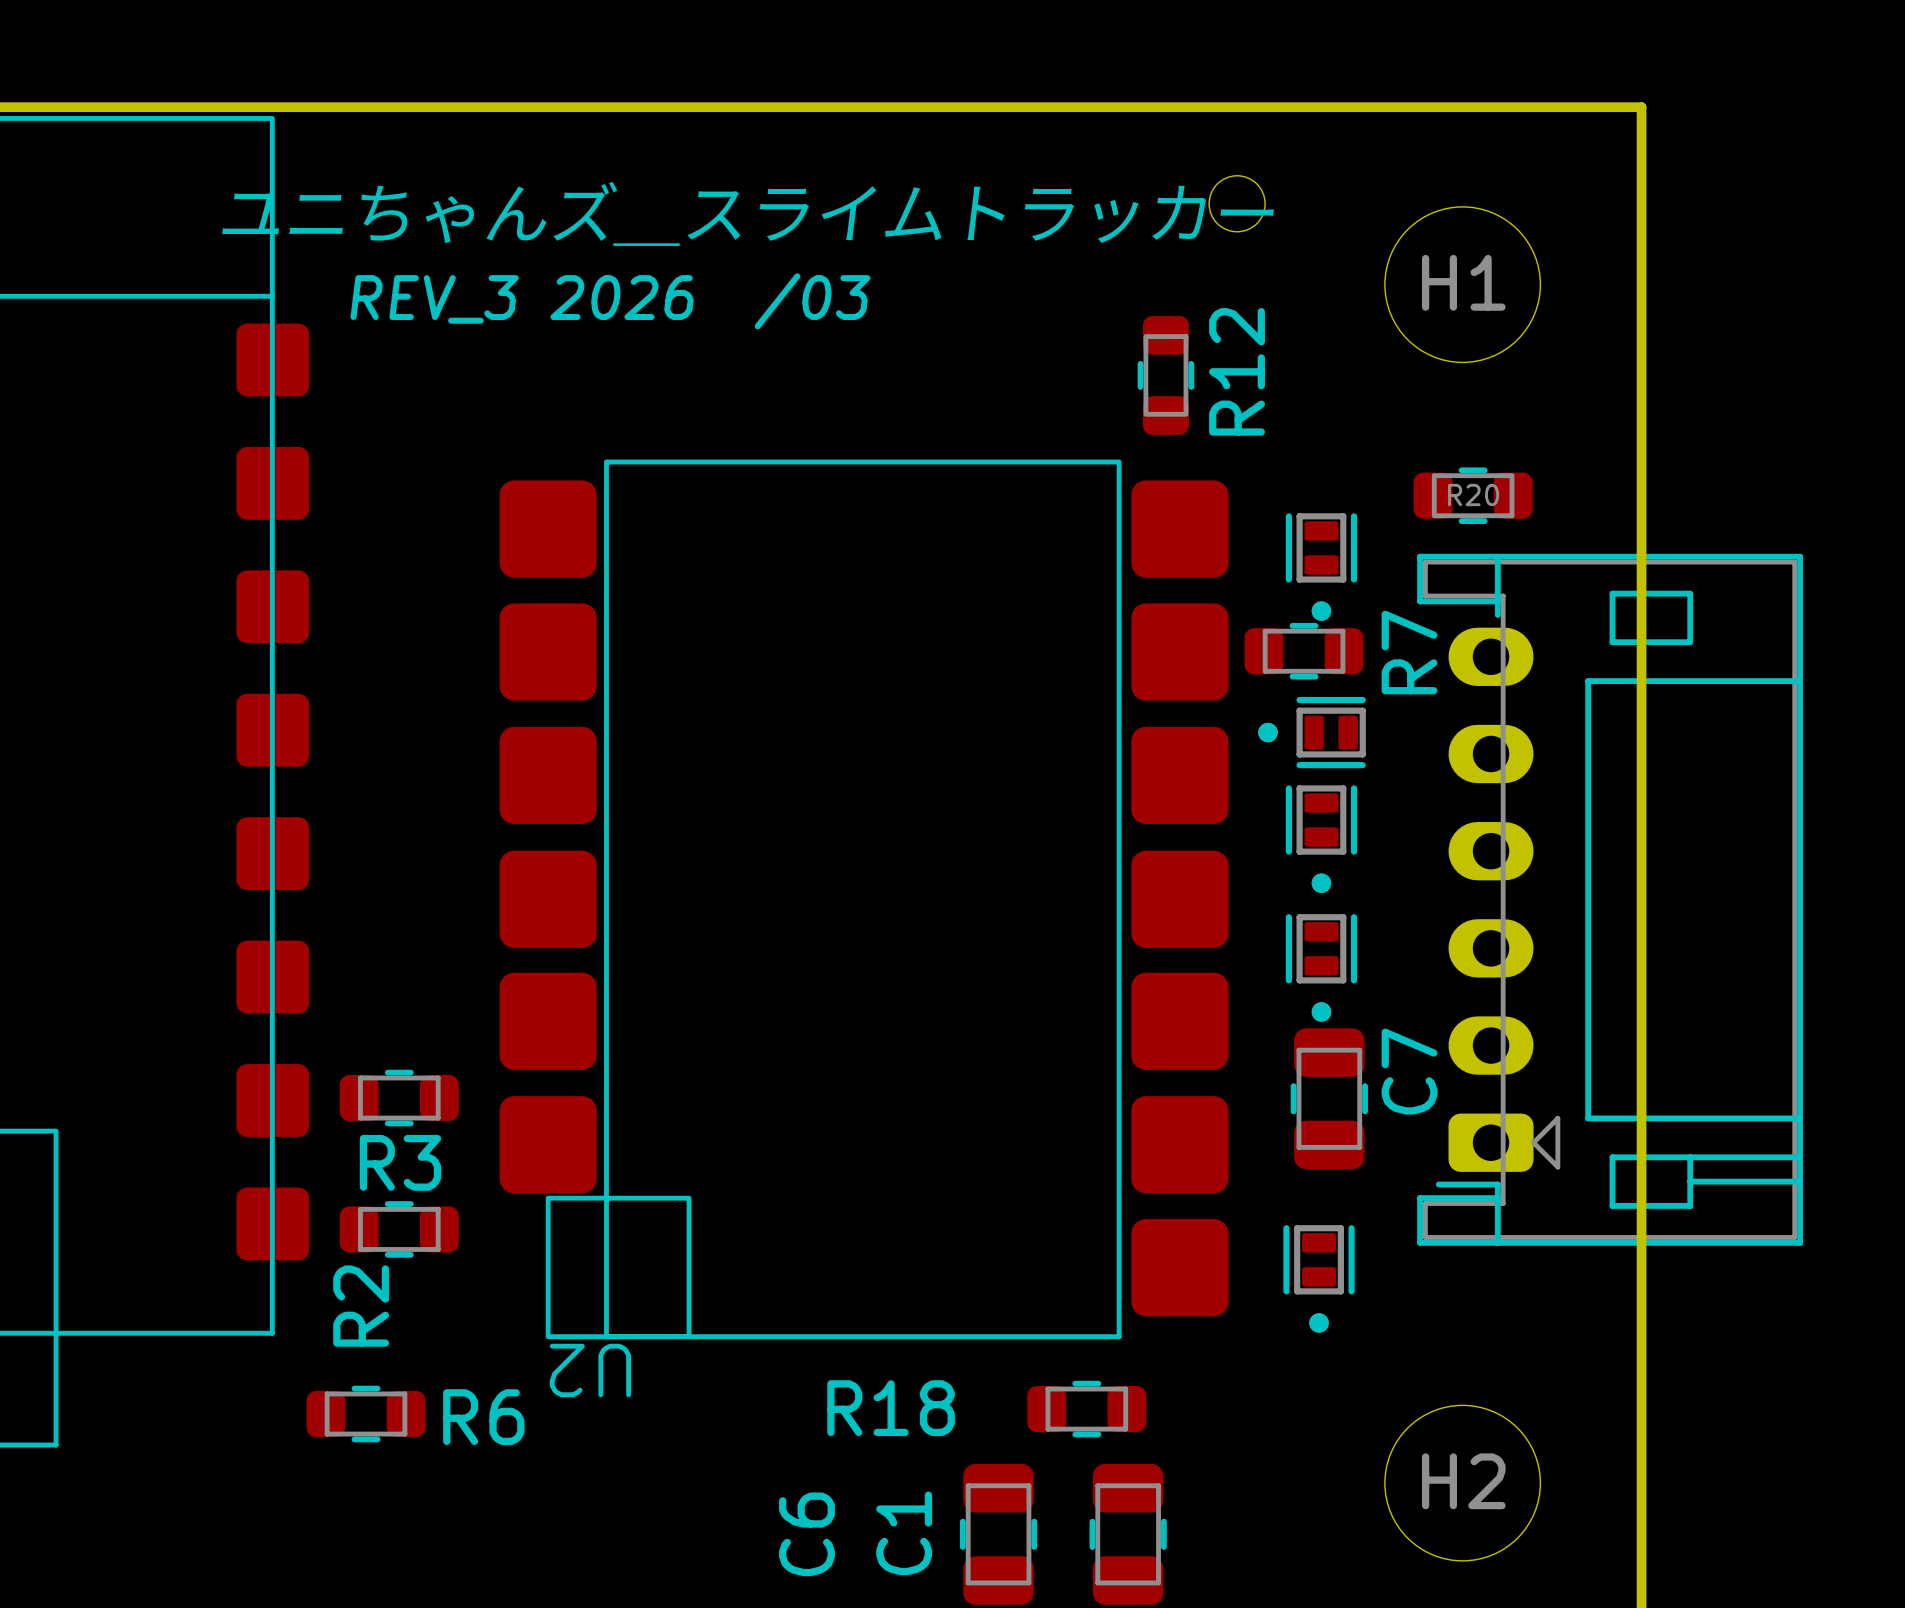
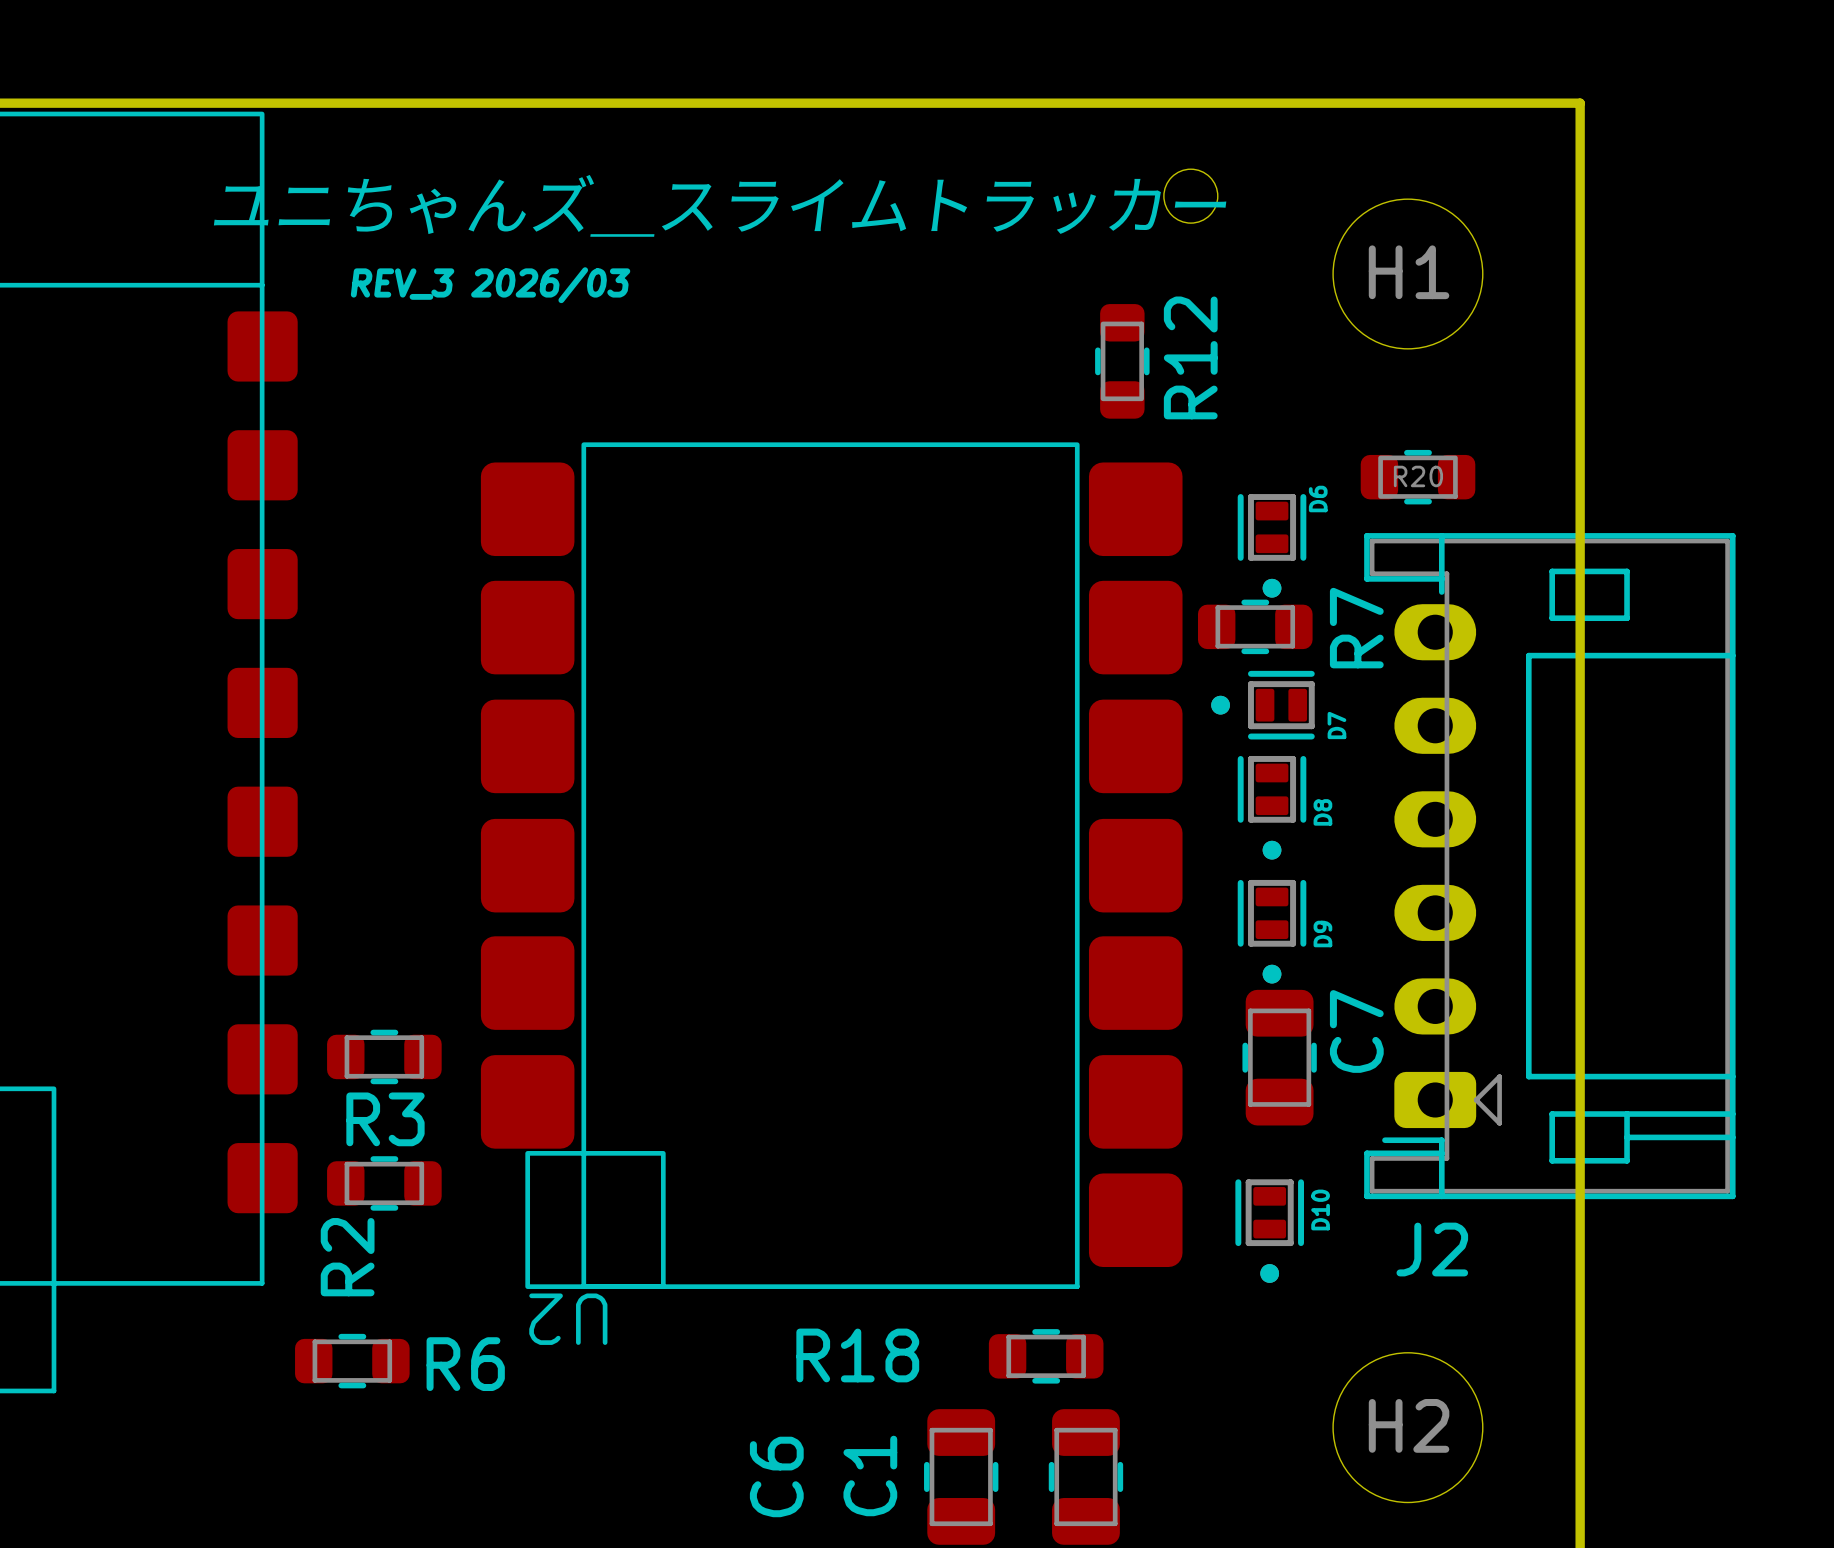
text: REV_3 2026 /03 (610, 301) -> REV_3 2026/03 (490, 285)
D6 name: none -> D6 (1318, 499)
D7 name: none -> D7 (1336, 725)
D8 name: none -> D8 (1322, 812)
D9 name: none -> D9 (1322, 934)
D10 name: none -> D10 (1320, 1209)
J2 name: none -> J2 (1432, 1249)

